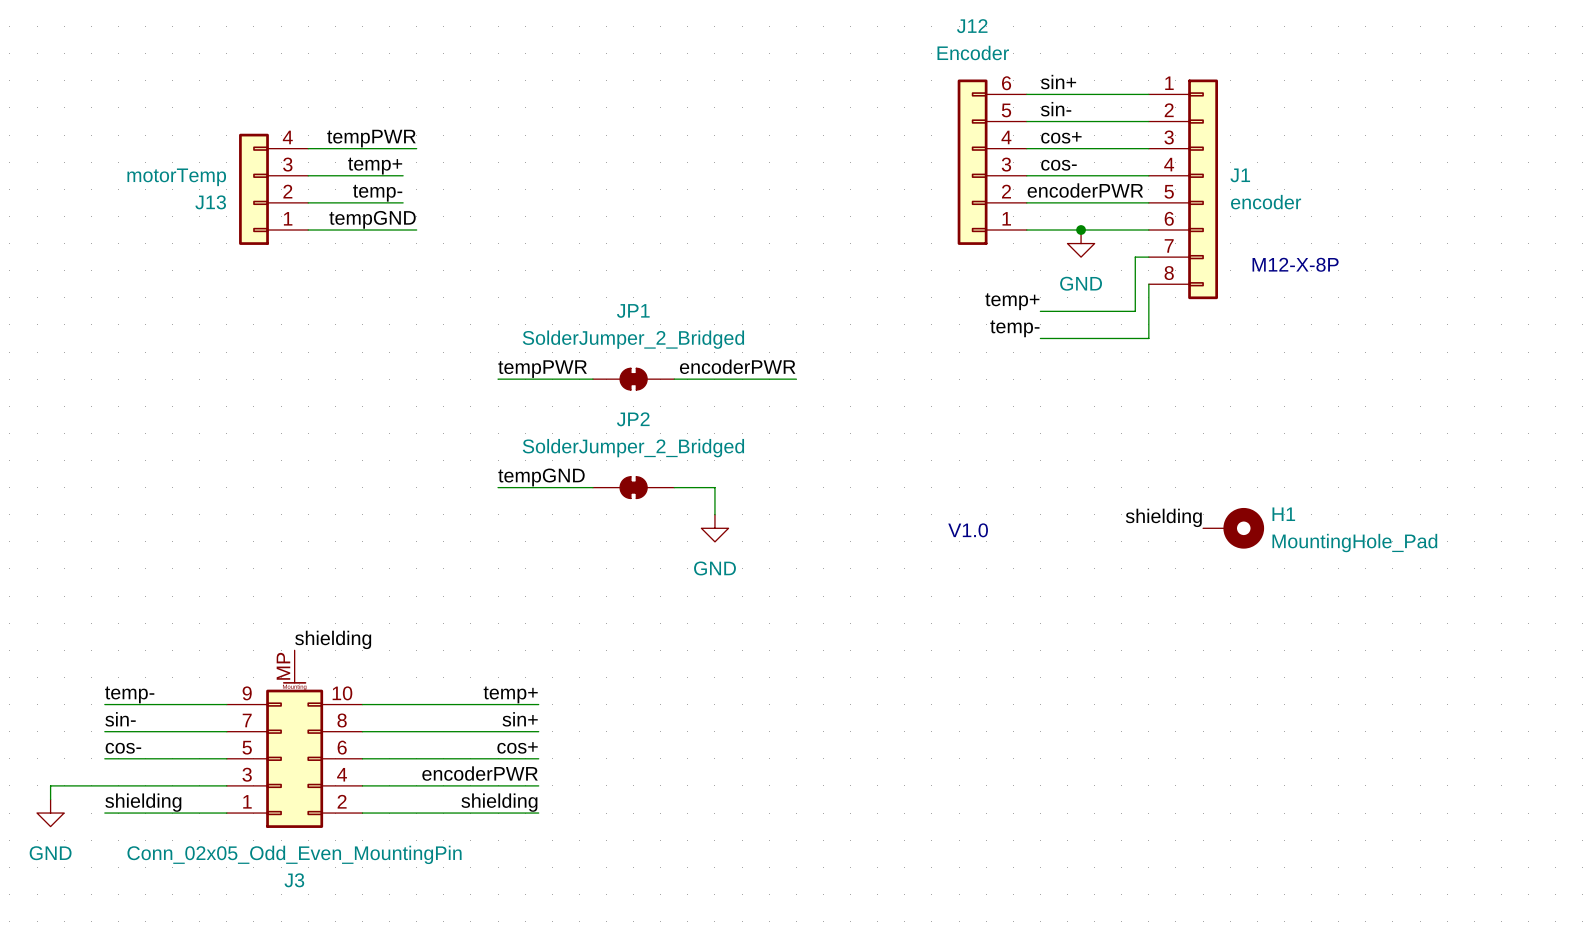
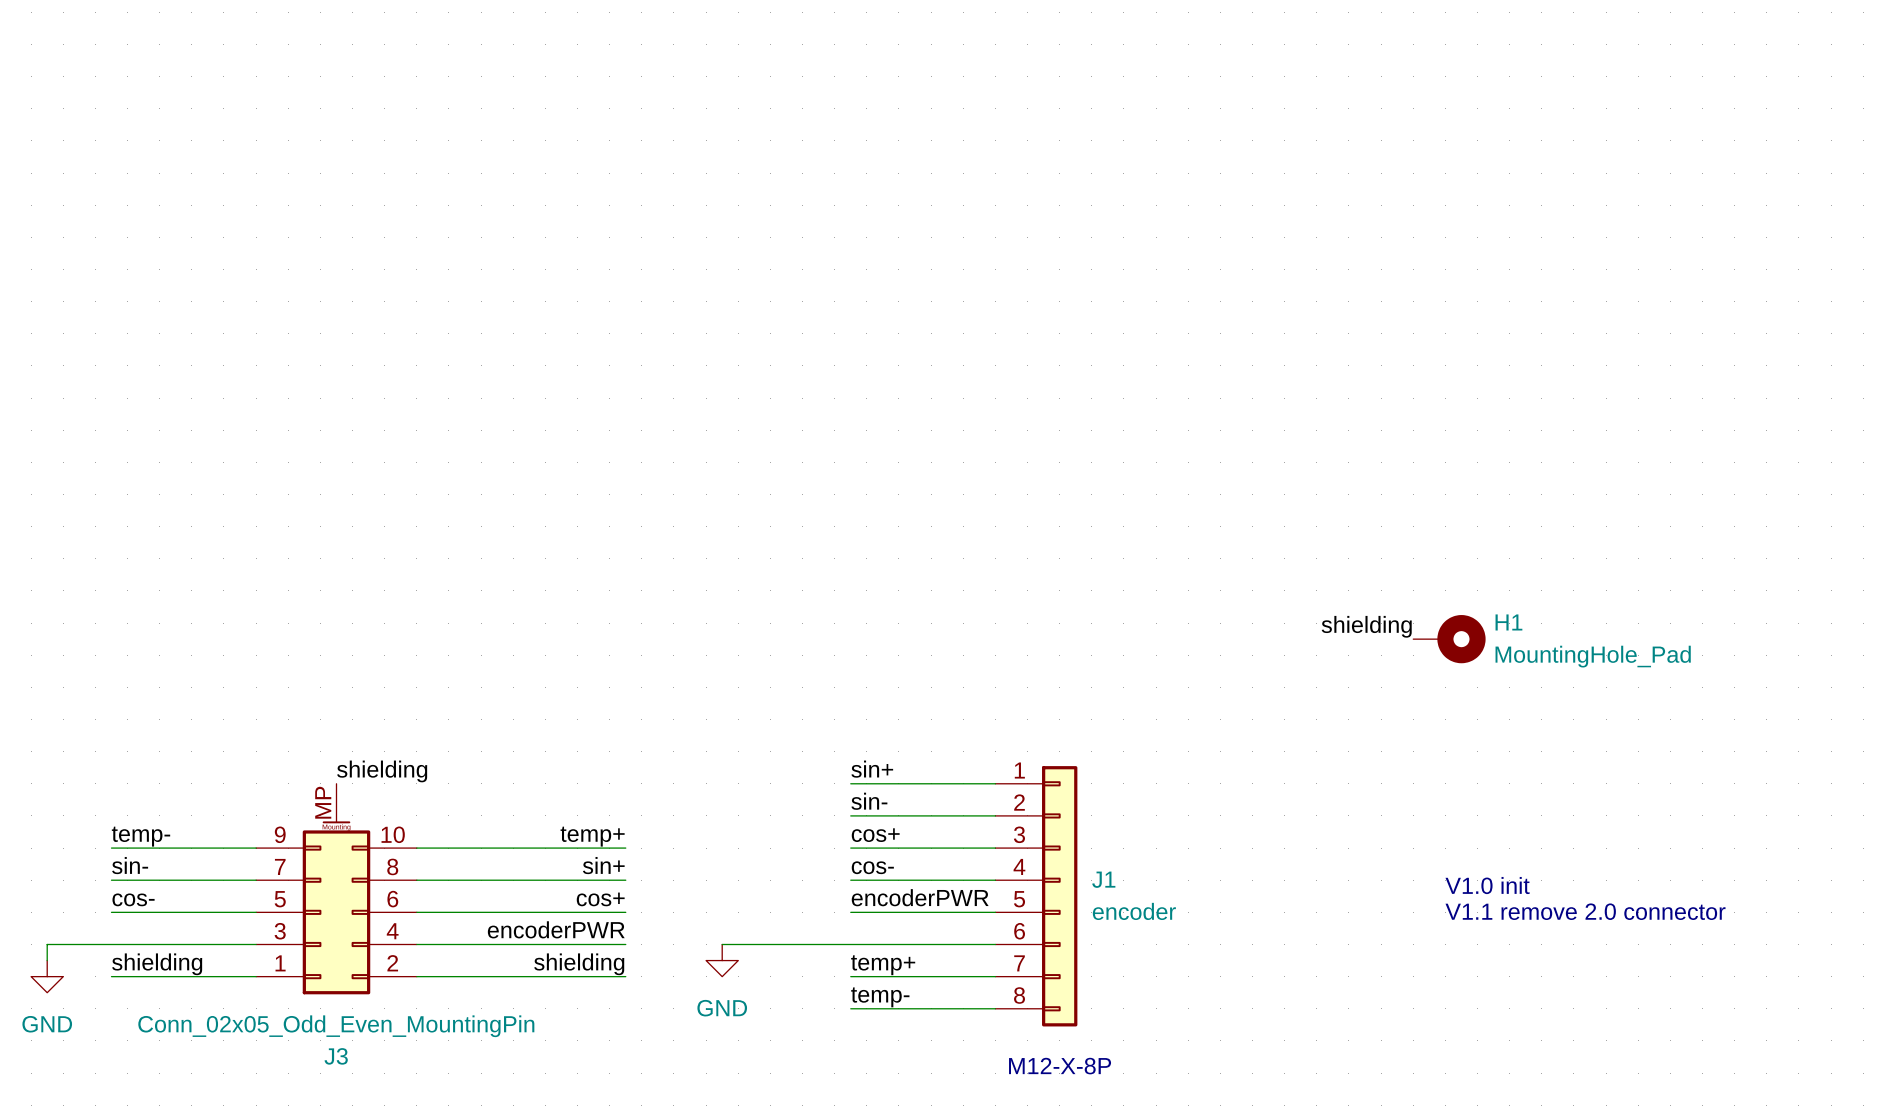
label: sin+ (1058, 82) -> none
wire: (1026, 94) (1148, 94) -> none
label: sin- (1056, 109) -> none
wire: (1026, 121) (1148, 121) -> none
label: cos+ (1061, 137) -> none
label: tempPWR (371, 138) -> none
wire: (308, 148) (416, 148) -> none
wire: (1026, 148) (1148, 148) -> none
J12: Encoder (992, 162) -> none
label: cos- (1058, 165) -> none
label: temp+ (375, 166) -> none
wire: (308, 175) (403, 175) -> none
wire: (1026, 175) (1148, 175) -> none
J13: motorTemp (273, 189) -> none
J1 position: (1183, 189) -> (1036, 896)
label: encoderPWR (1085, 190) -> none
label: temp- (377, 193) -> none
wire: (308, 202) (403, 202) -> none
wire: (1026, 202) (1148, 202) -> none
label: tempGND (372, 219) -> none
wire: (308, 230) (416, 230) -> none
wire: (1026, 230) (1148, 230) -> none
junction: (1081, 230) -> none
power symbol: GND (1081, 243) -> none
wire: (1148, 257) (1135, 257) (1135, 311) (1040, 311) -> none
text: M12-X-8P (1295, 264) -> none
wire: (1148, 284) (1148, 338) (1040, 338) -> none
label: temp+ (1012, 301) -> none
label: temp- (1014, 328) -> none
label: encoderPWR (737, 366) -> none
label: tempPWR (542, 369) -> none
wire: (498, 379) (592, 379) -> none
JP1: SolderJumper_2_Bridged (633, 379) -> none
wire: (674, 379) (796, 379) -> none
label: tempGND (541, 477) -> none
wire: (498, 487) (592, 487) -> none
JP2: SolderJumper_2_Bridged (633, 487) -> none
wire: (674, 487) (714, 487) (714, 514) -> none
power symbol: GND (714, 528) -> none
text: V1.0 (968, 530) -> none
label: none -> sin+ (872, 769)
wire: none -> (850, 783) (995, 783)
label: none -> sin- (869, 801)
wire: none -> (850, 815) (995, 815)
label: none -> cos+ (875, 835)
wire: none -> (850, 848) (995, 848)
label: none -> cos- (872, 867)
wire: none -> (850, 880) (995, 880)
text: none -> V1.0 init (1487, 885)
label: none -> encoderPWR (920, 897)
wire: none -> (850, 912) (995, 912)
text: none -> V1.1 remove 2.0 connector (1585, 911)
wire: none -> (722, 944) (995, 944)
power symbol: none -> GND (722, 960)
label: none -> temp+ (883, 965)
wire: none -> (850, 976) (995, 976)
label: none -> temp- (880, 997)
wire: none -> (850, 1008) (995, 1008)
text: none -> M12-X-8P (1060, 1066)

